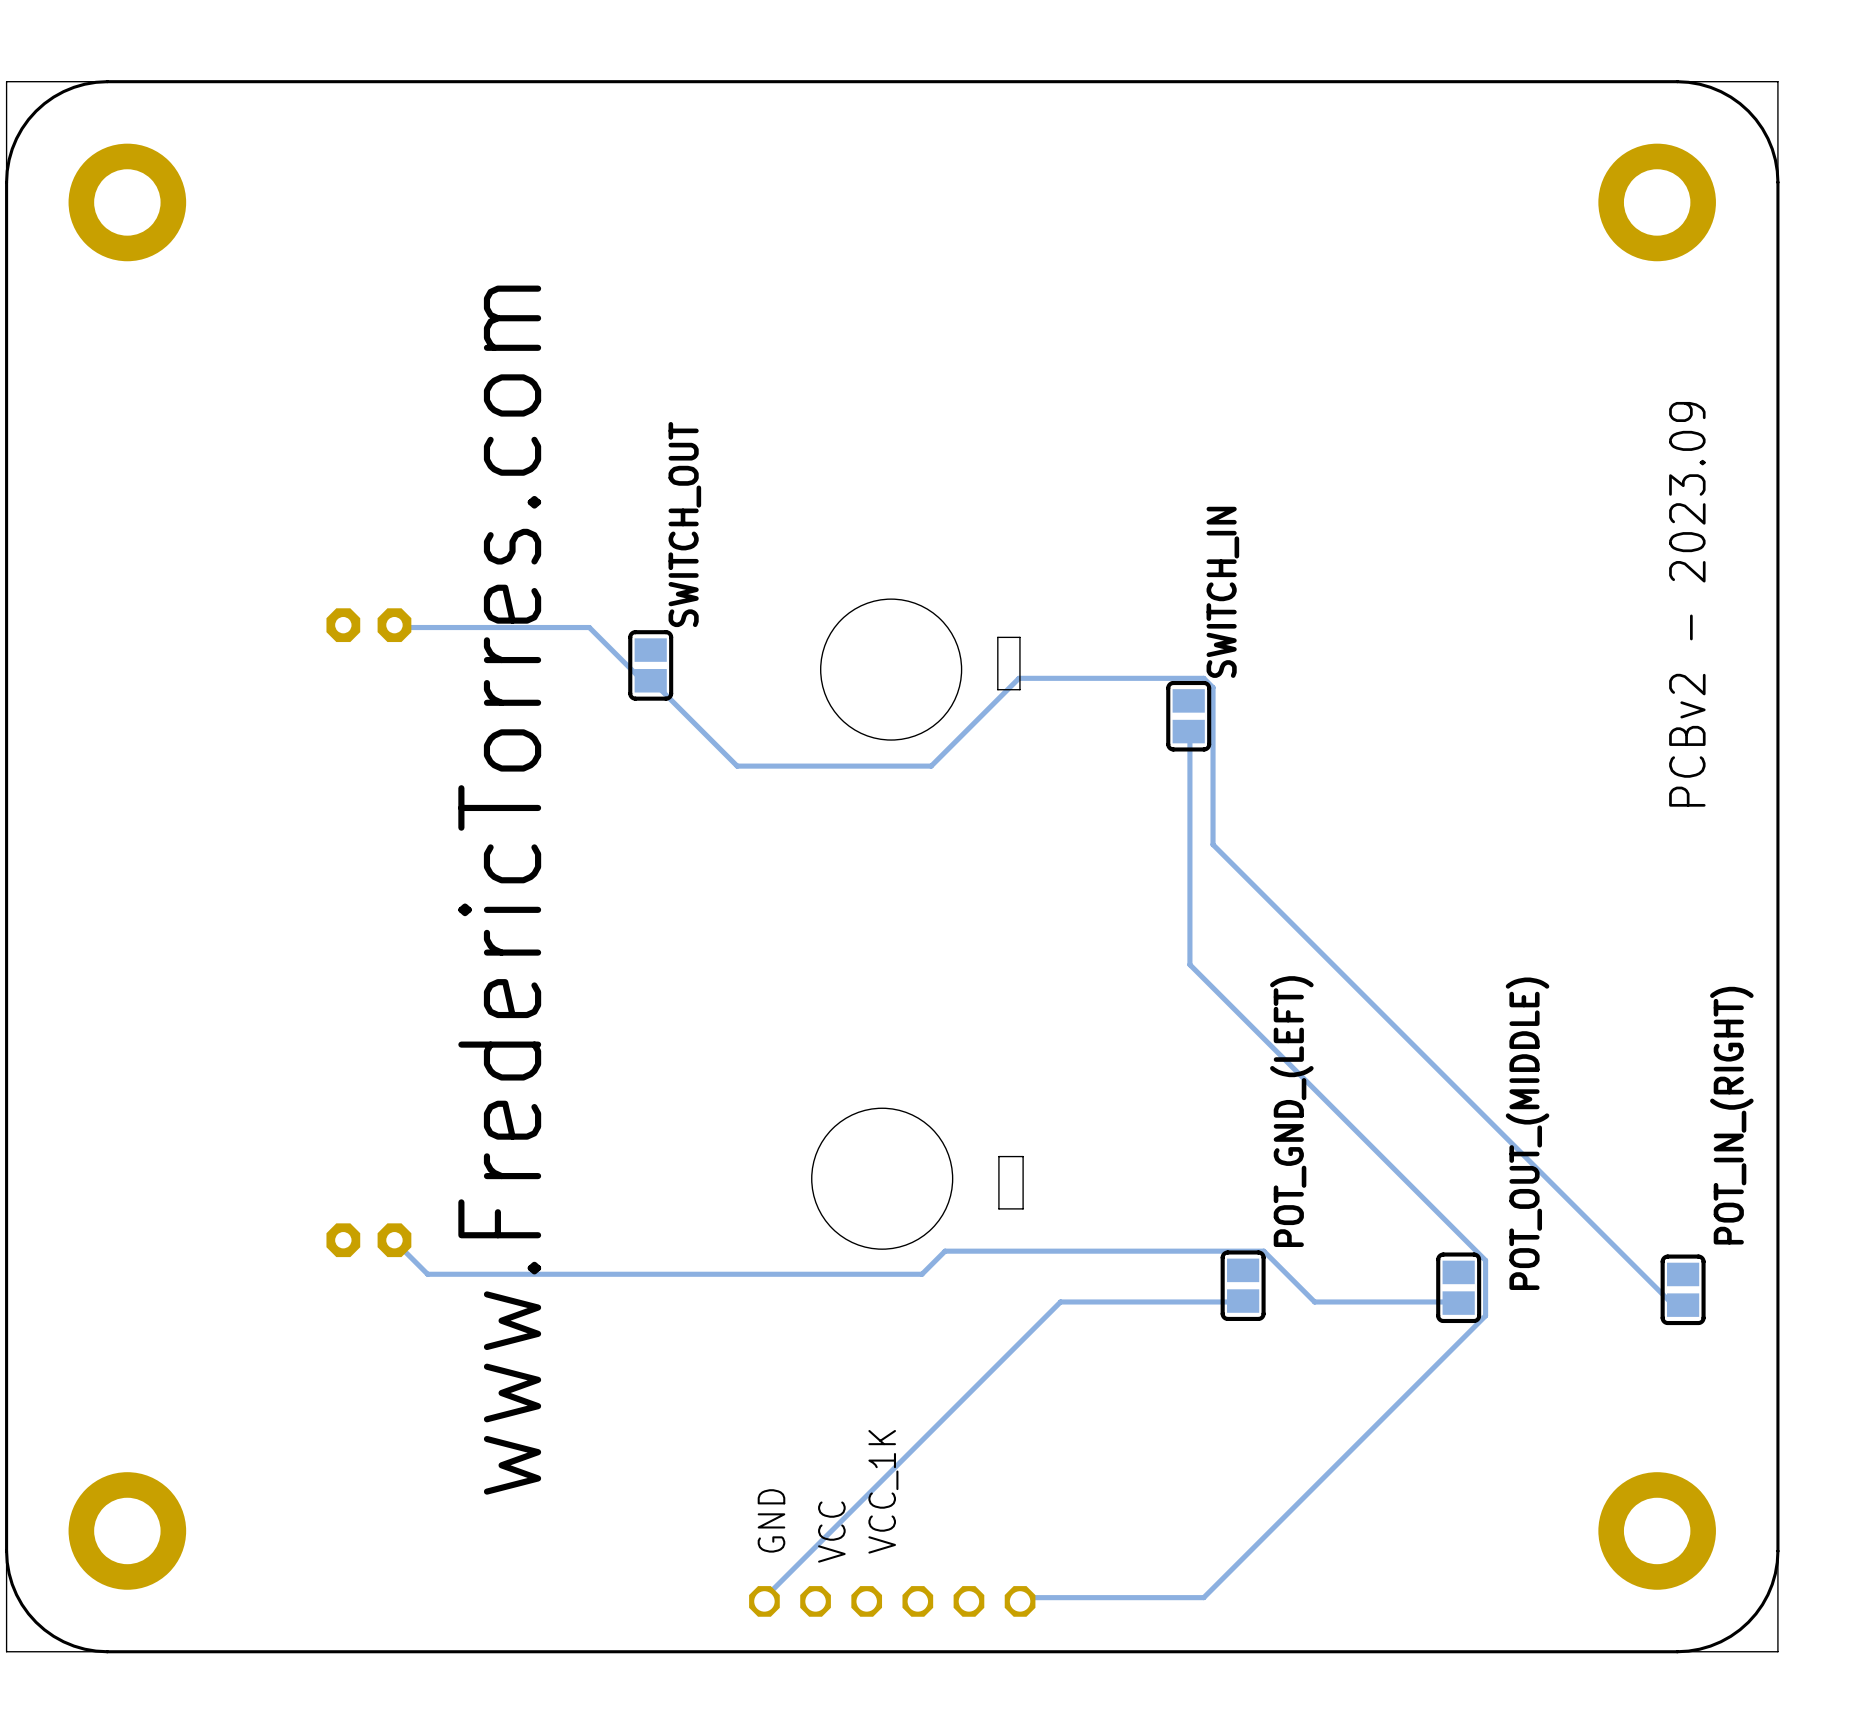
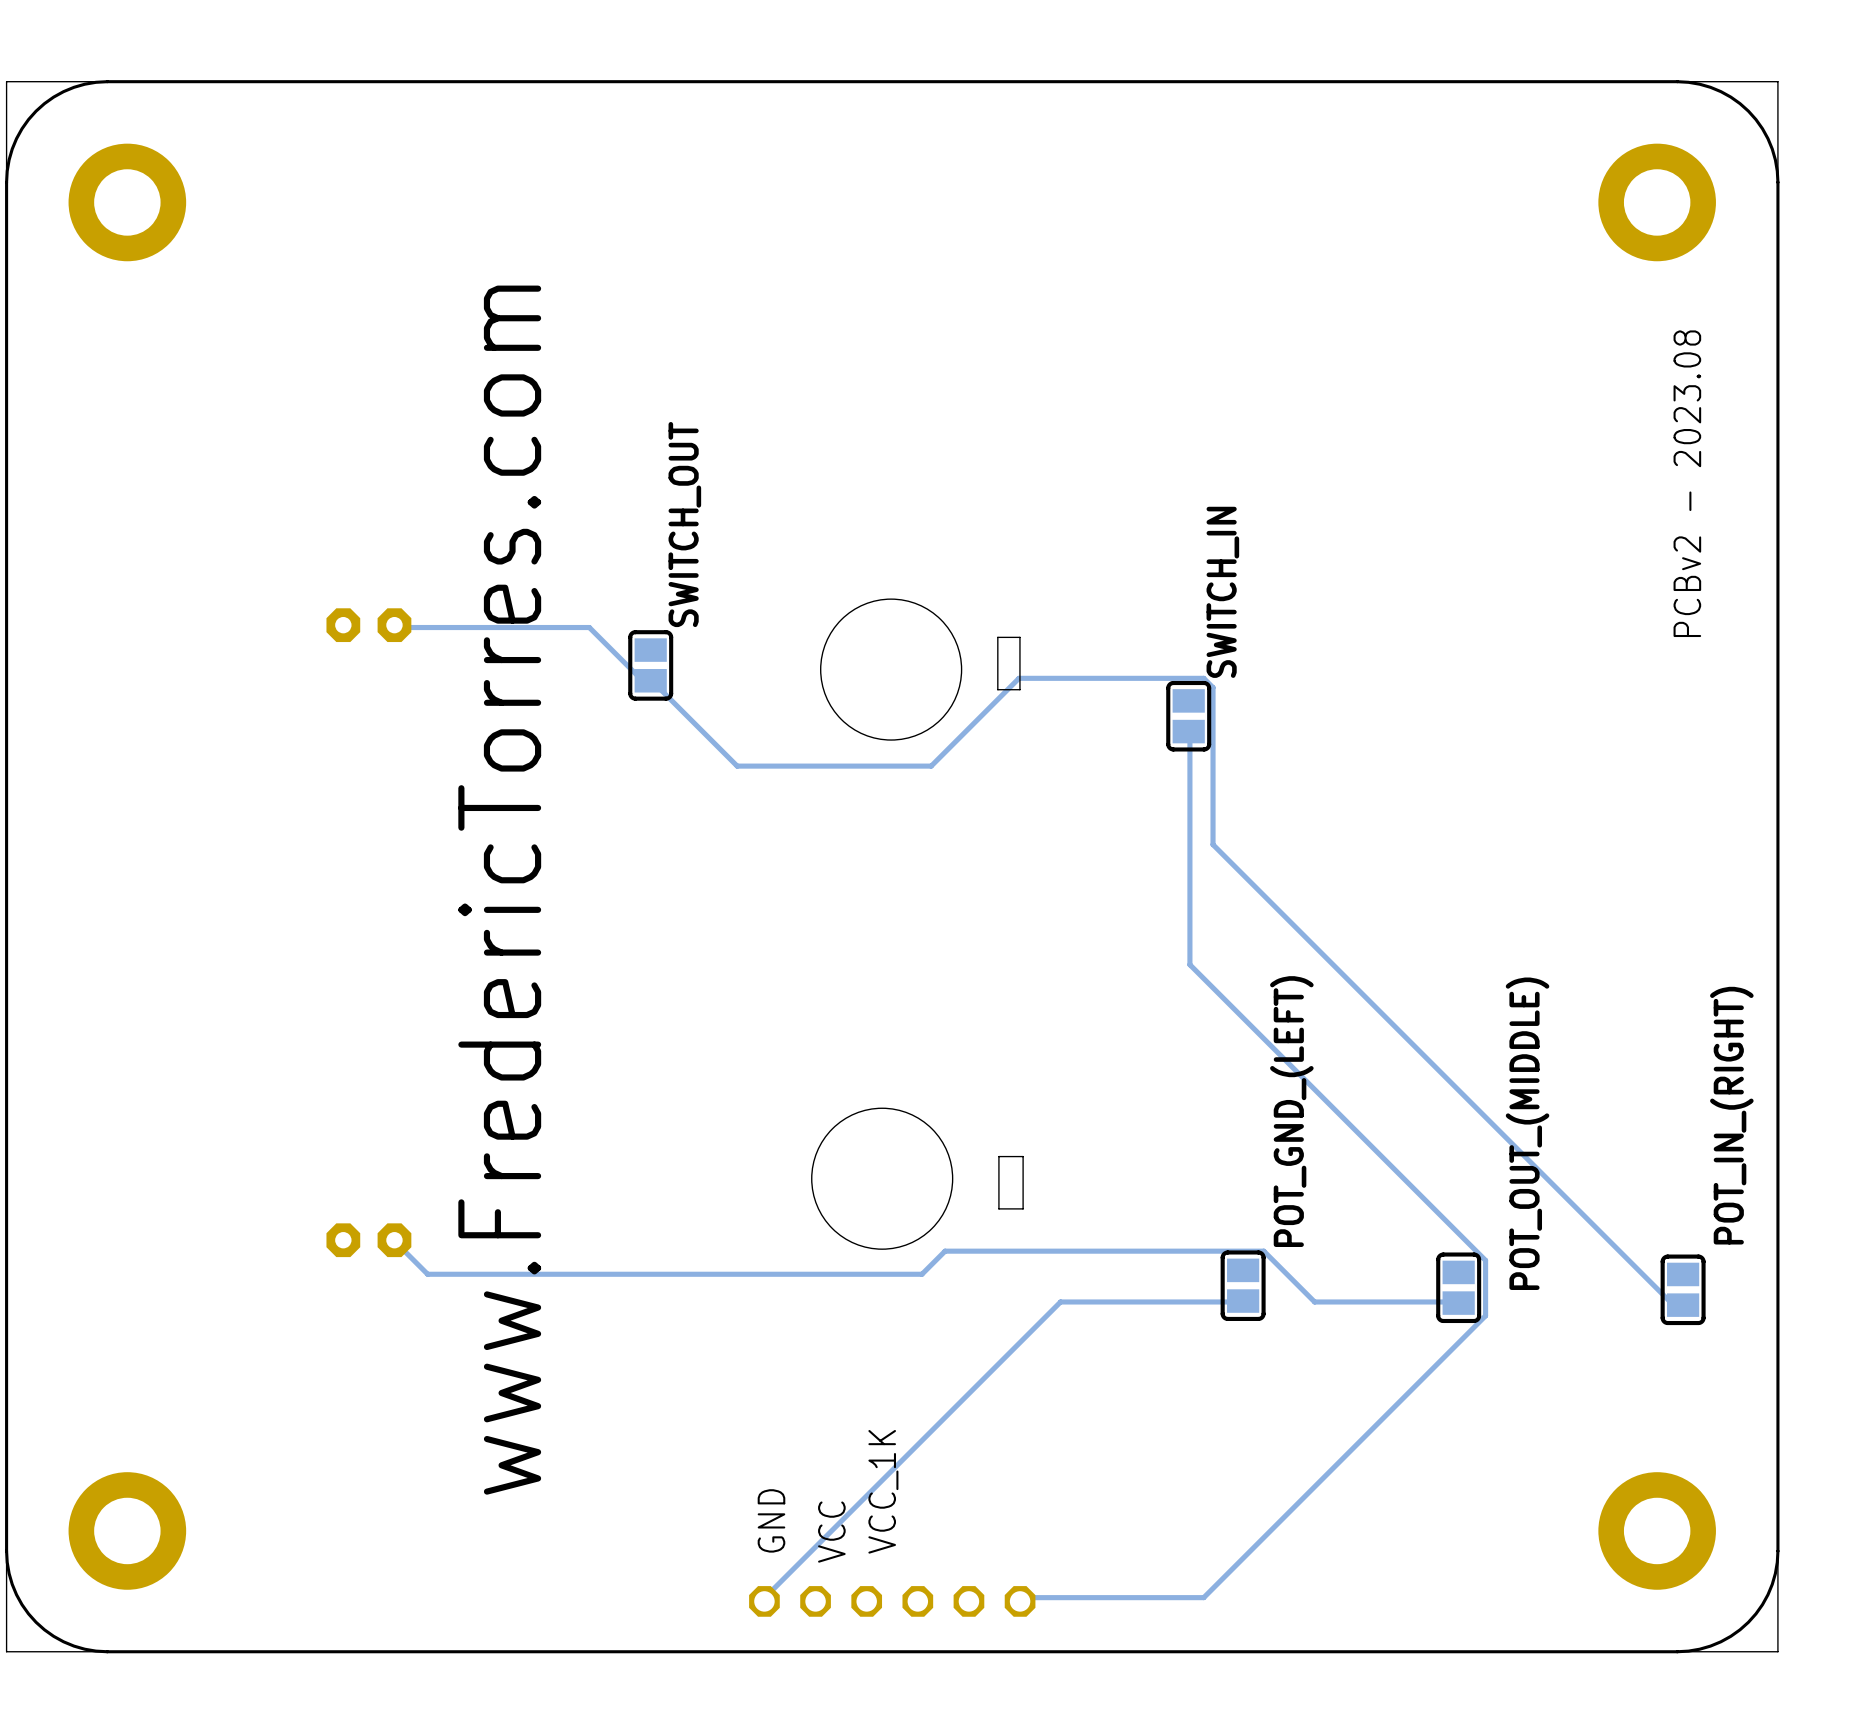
text: PCBv2 - 2023.09 (1687, 604) -> PCBv2 - 2023.08 (1687, 483)

